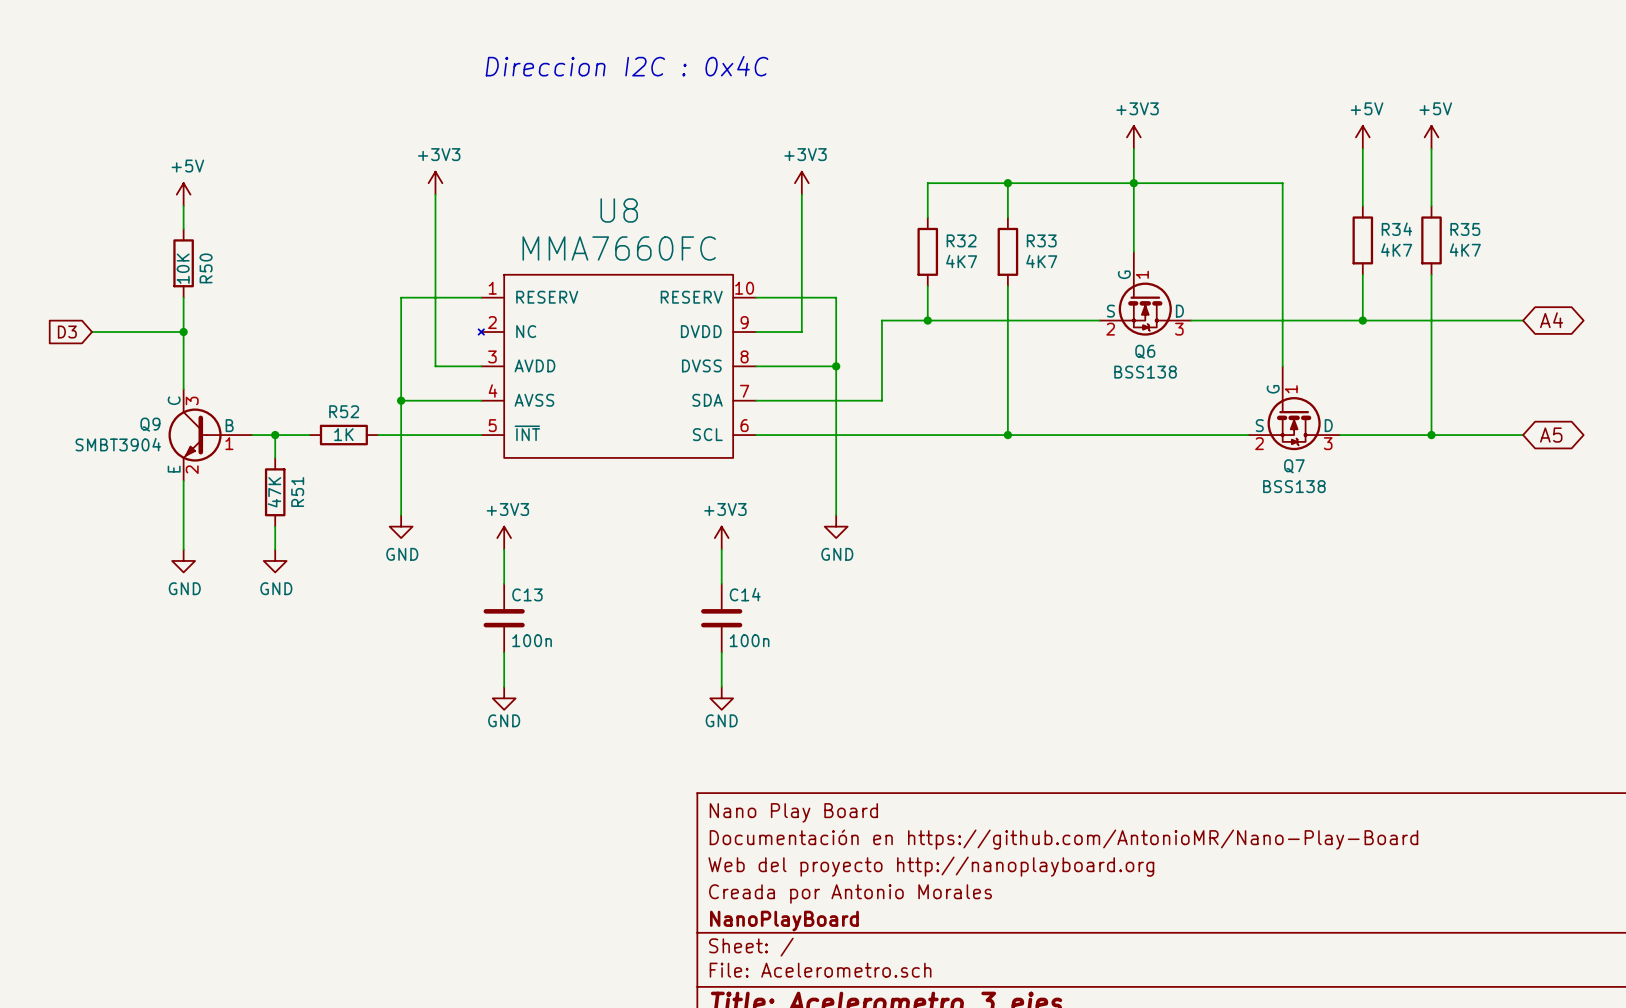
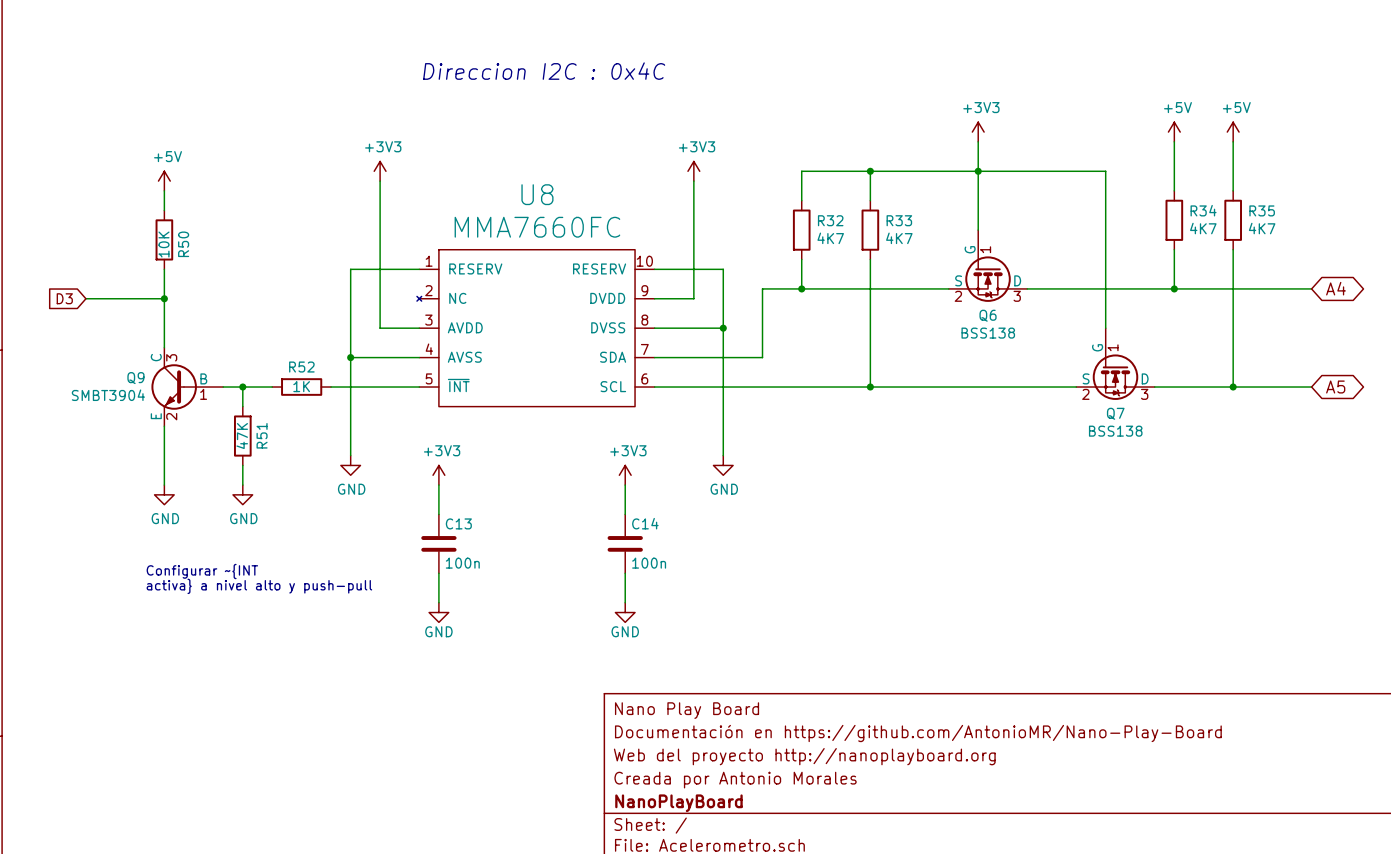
text: none -> Configurar ~{INT (202, 571)
text: none -> activa} a nivel alto y push-pull (259, 586)

